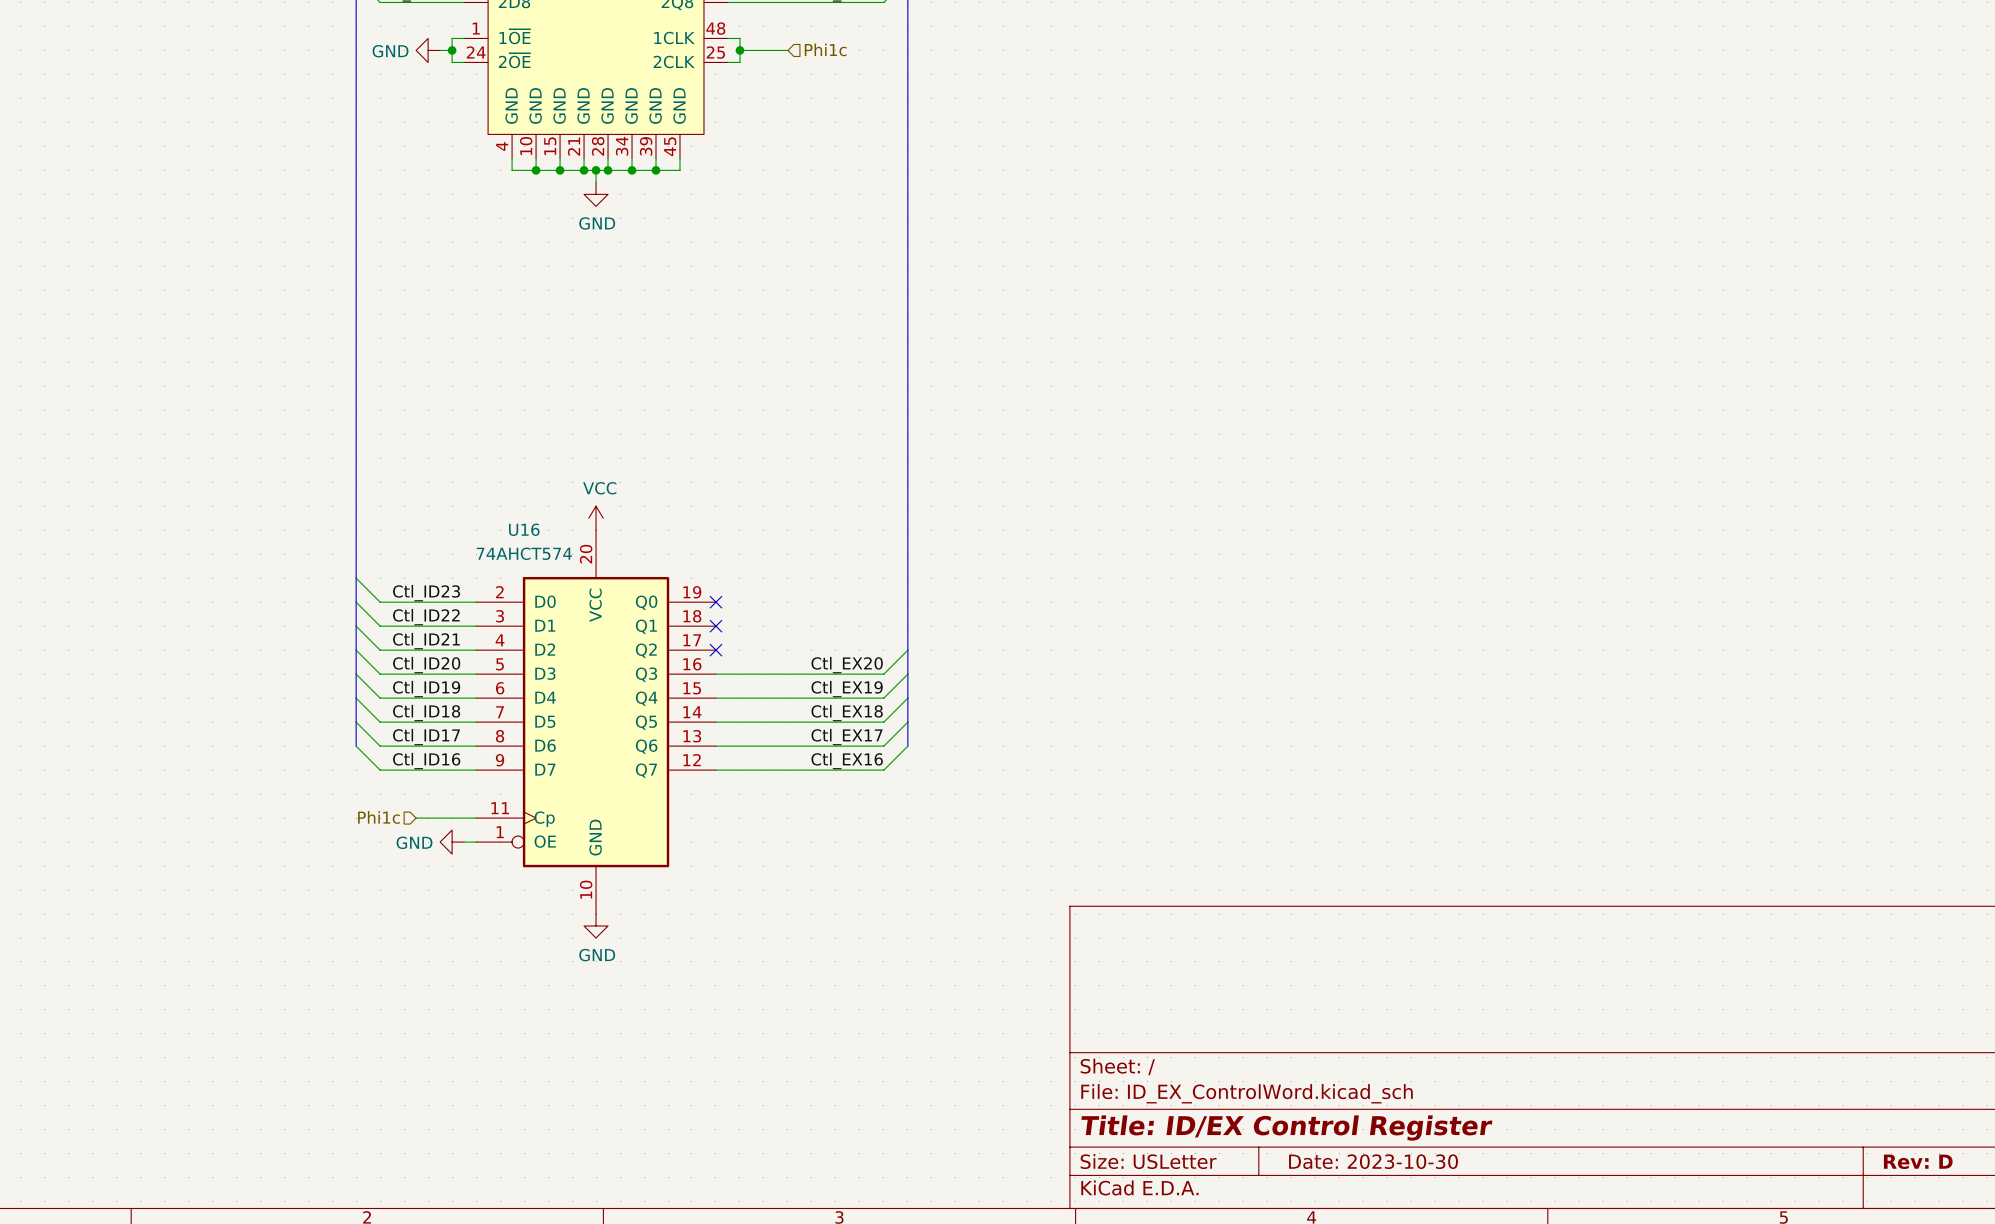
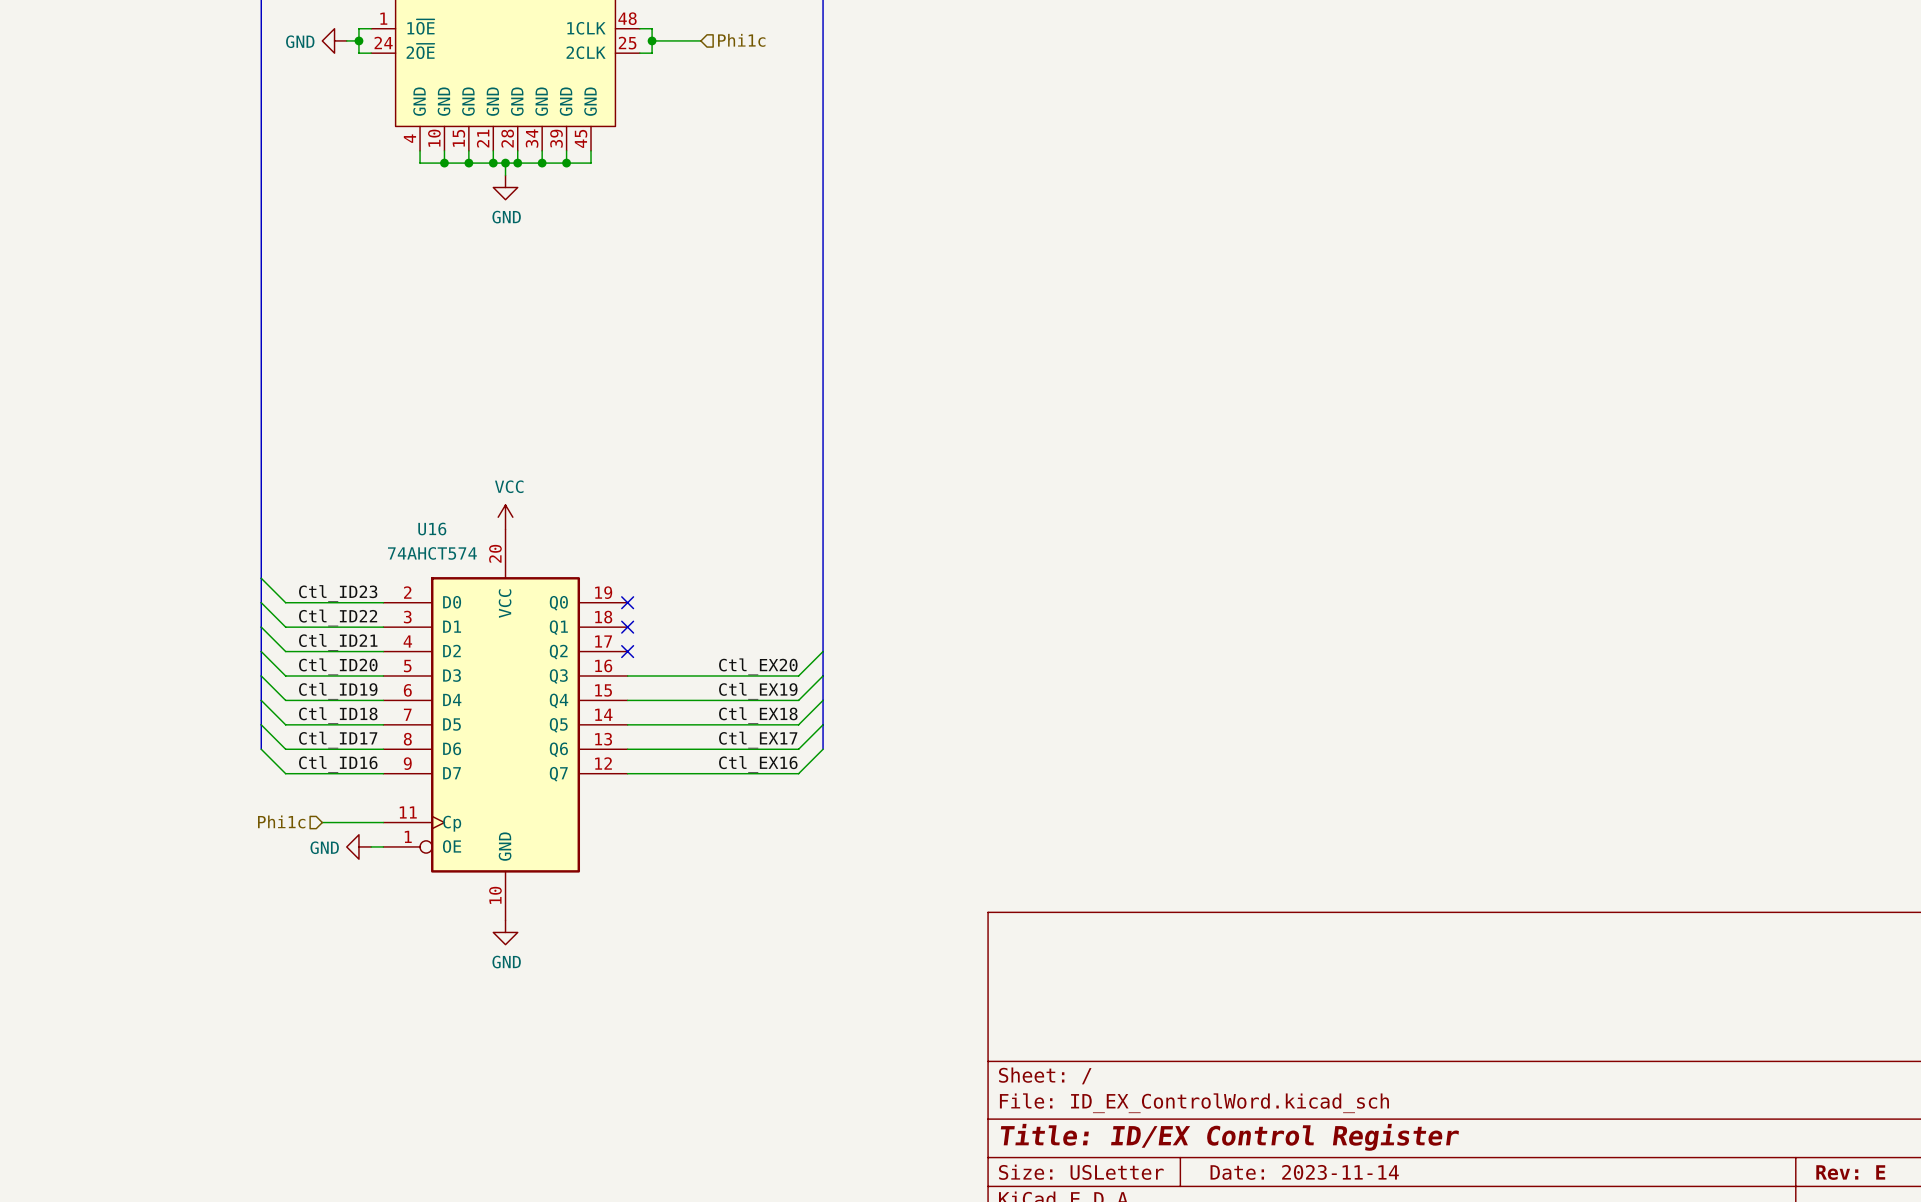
title block: Date: 2023-10-30 (1373, 1161) -> Date: 2023-11-14 (1304, 1172)
title block: Rev: D (1918, 1161) -> Rev: E (1850, 1172)

